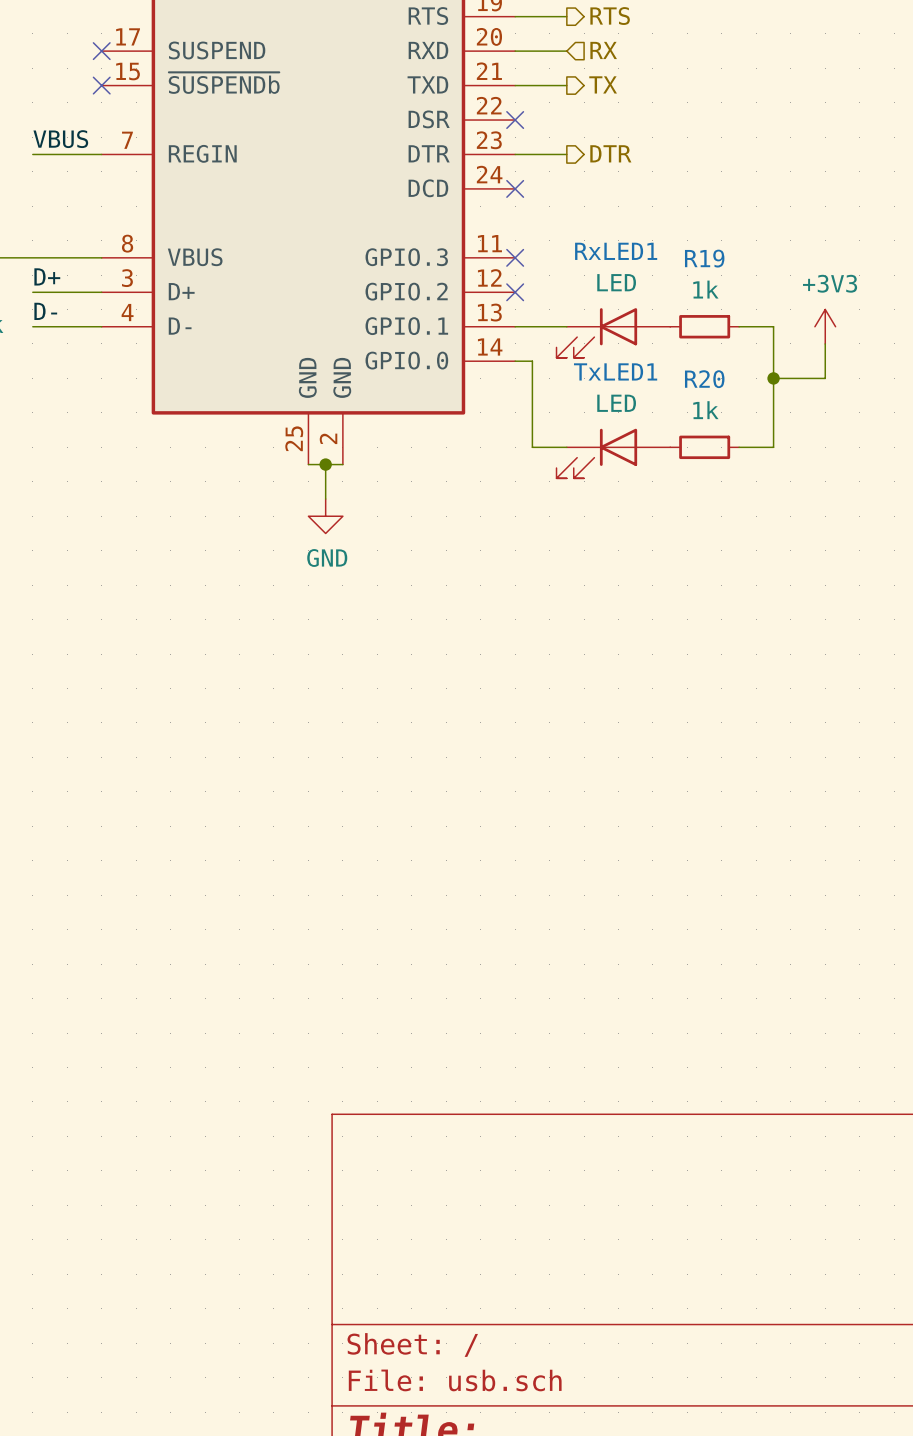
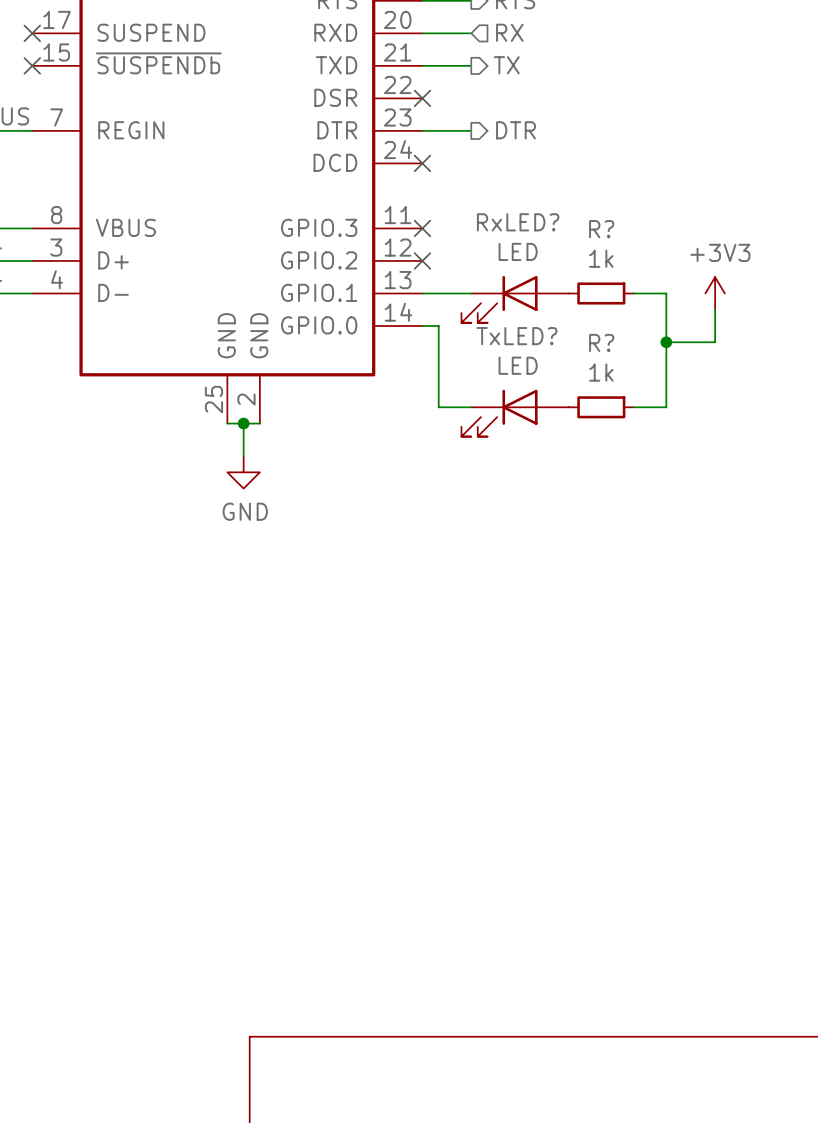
RxLED1 name: RxLED1 (616, 251) -> RxLED? (518, 222)
R19 name: R19 (704, 258) -> R? (601, 229)
TxLED1 name: TxLED1 (615, 371) -> TxLED? (516, 336)
R20 name: R20 (704, 379) -> R? (601, 342)

